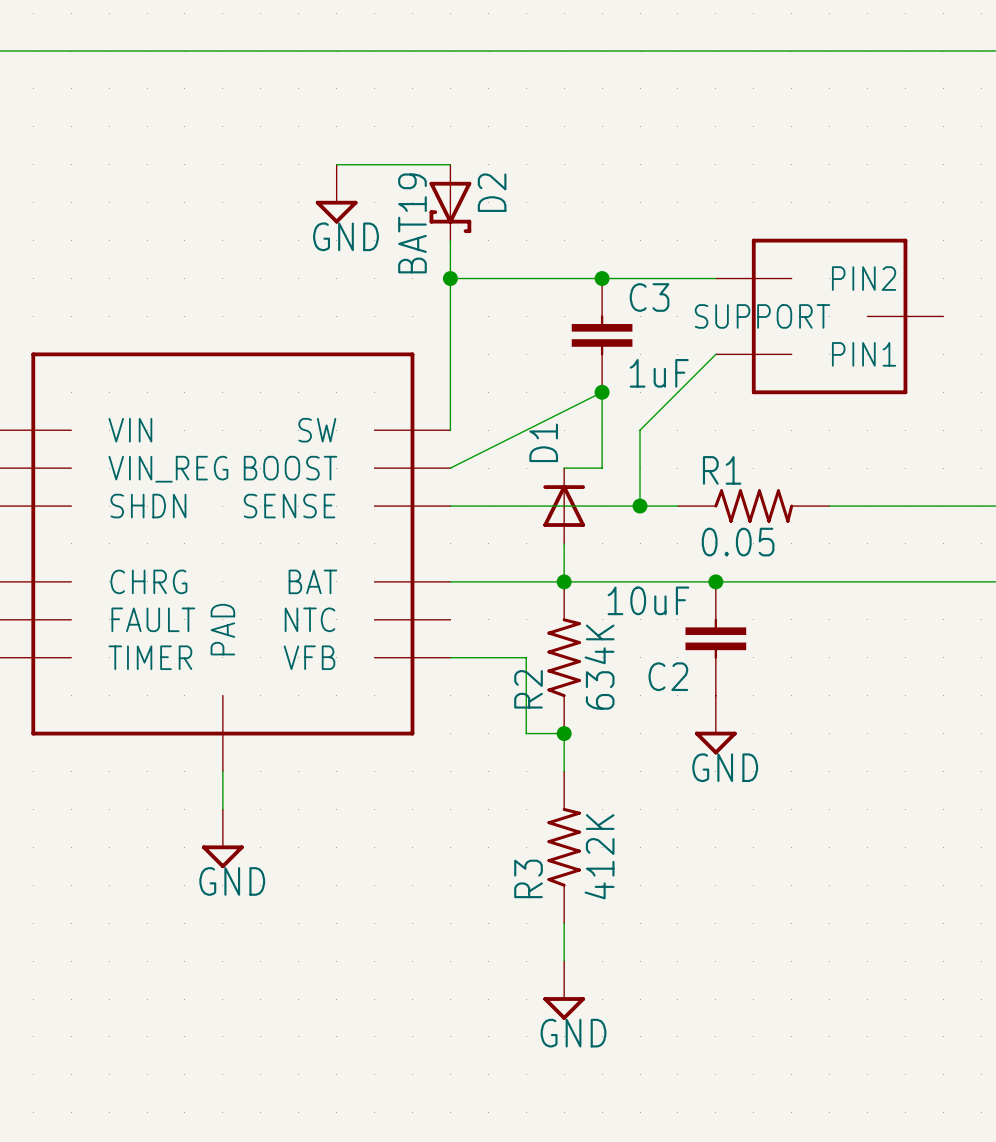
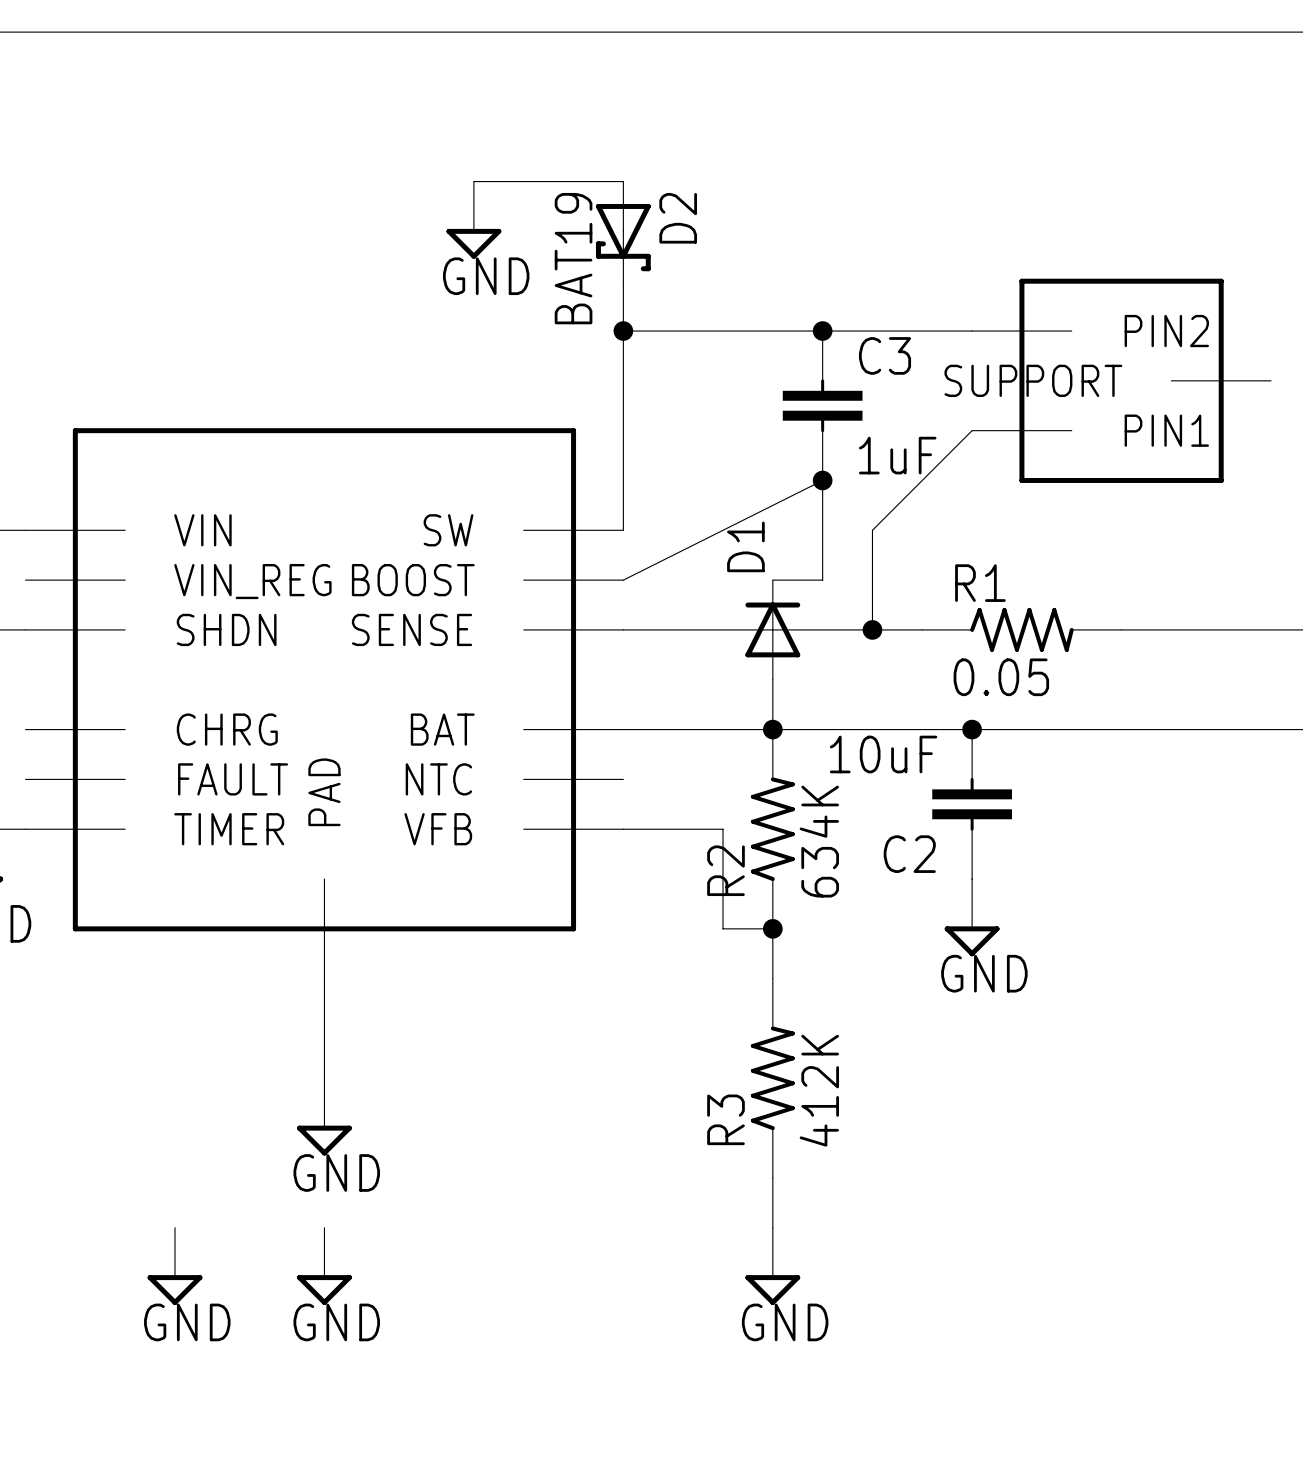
power symbol position: GND (222, 838) -> GND (324, 1116)
power symbol: none -> GND (174, 1266)
power symbol: none -> GND (324, 1266)

